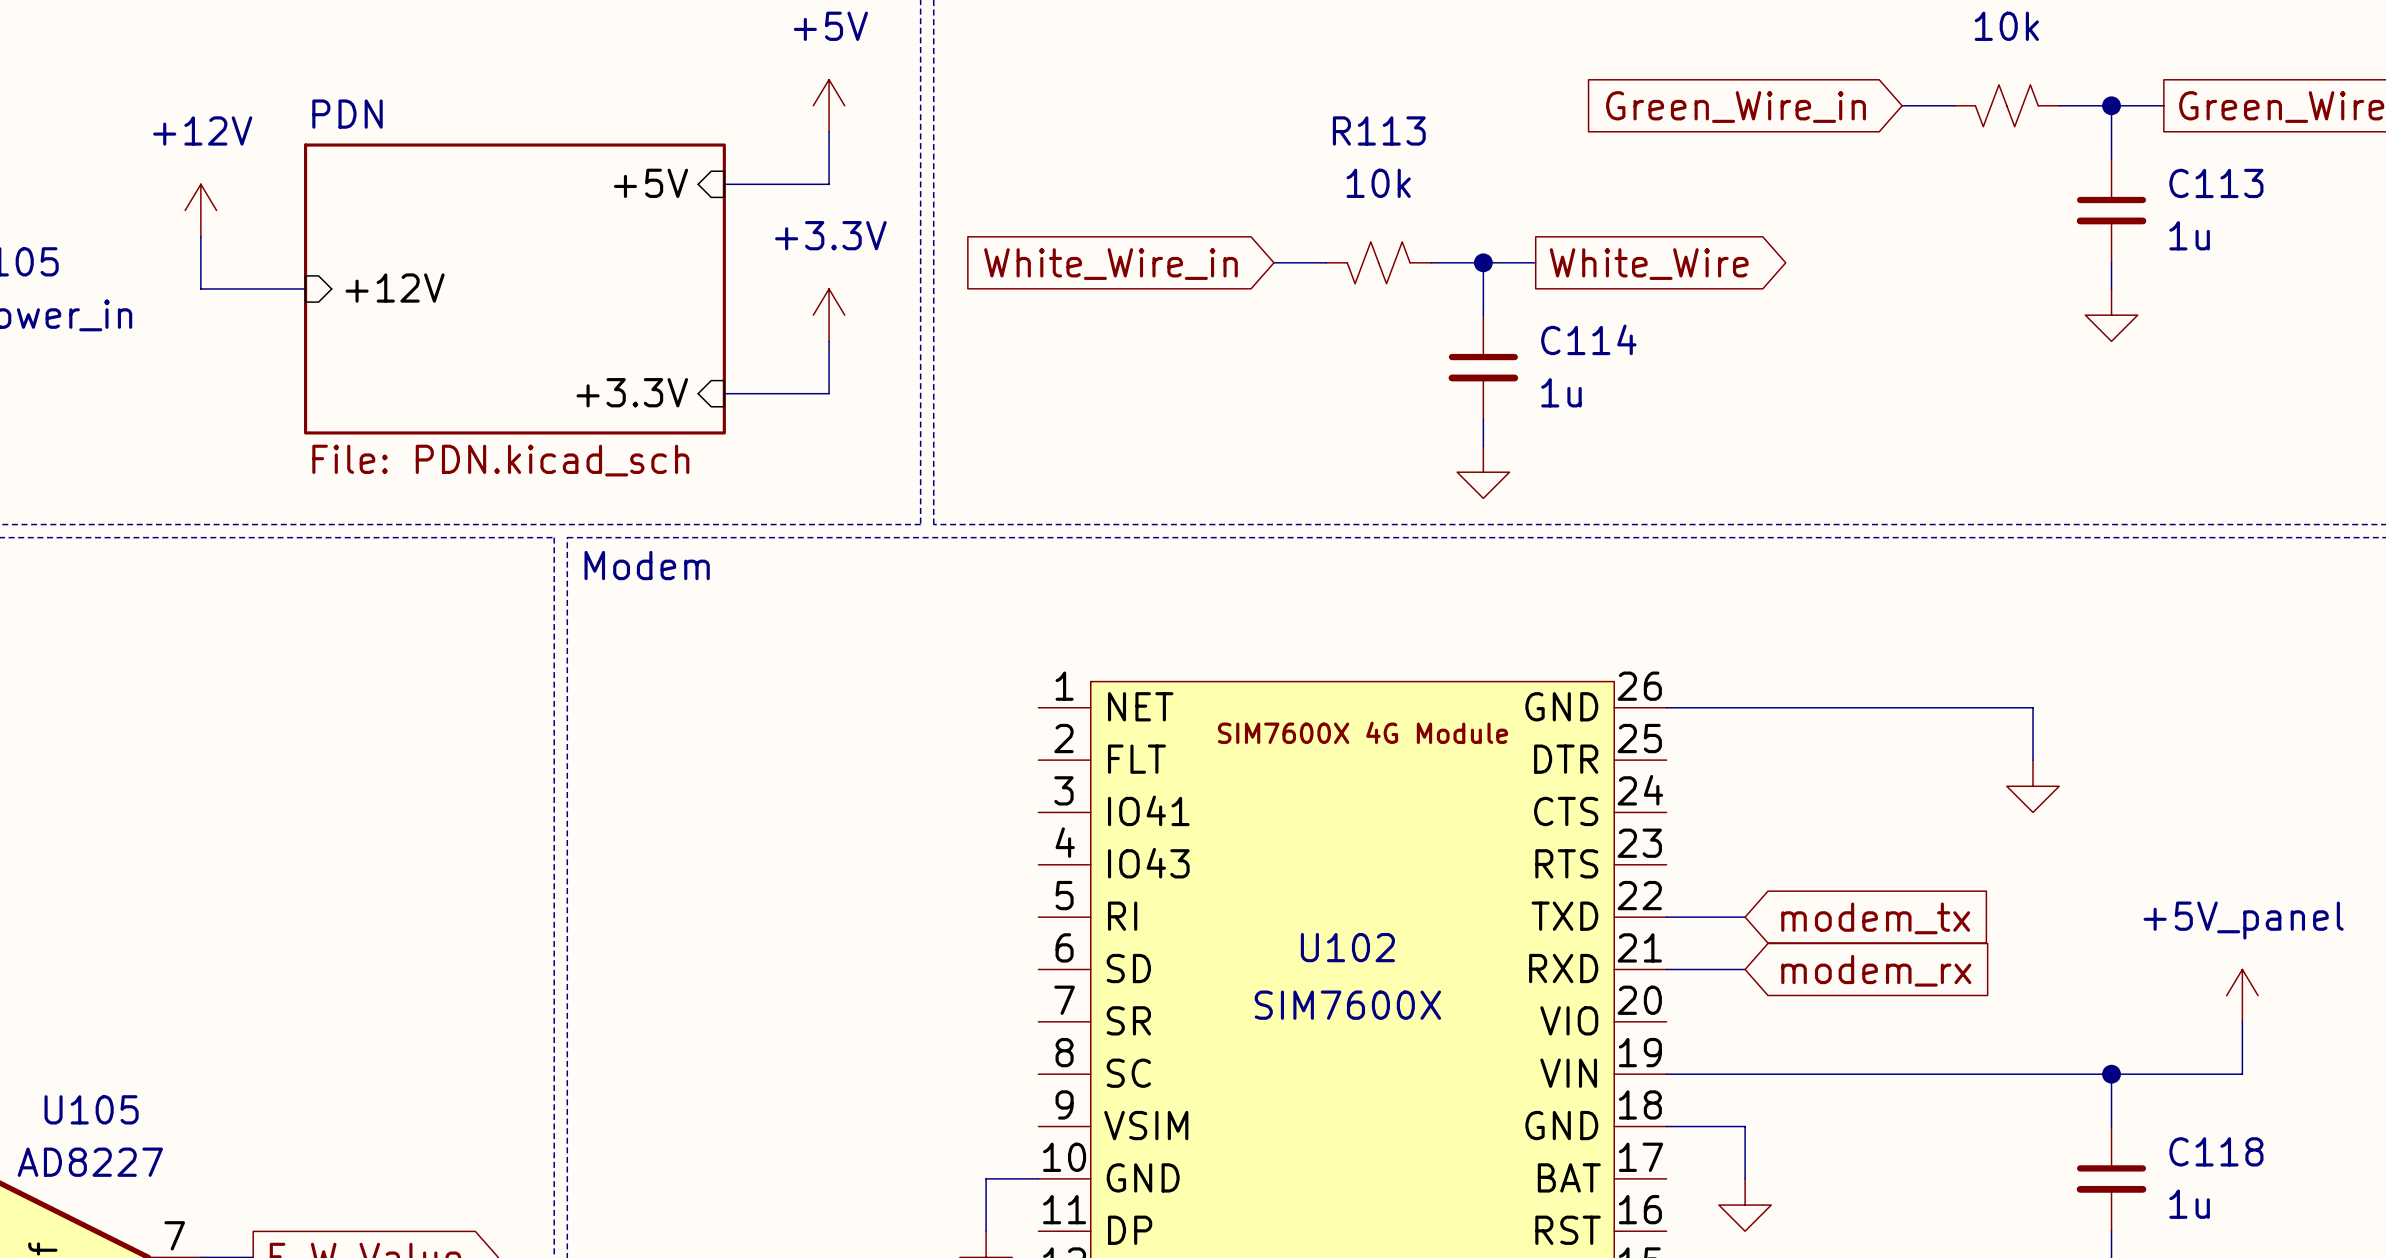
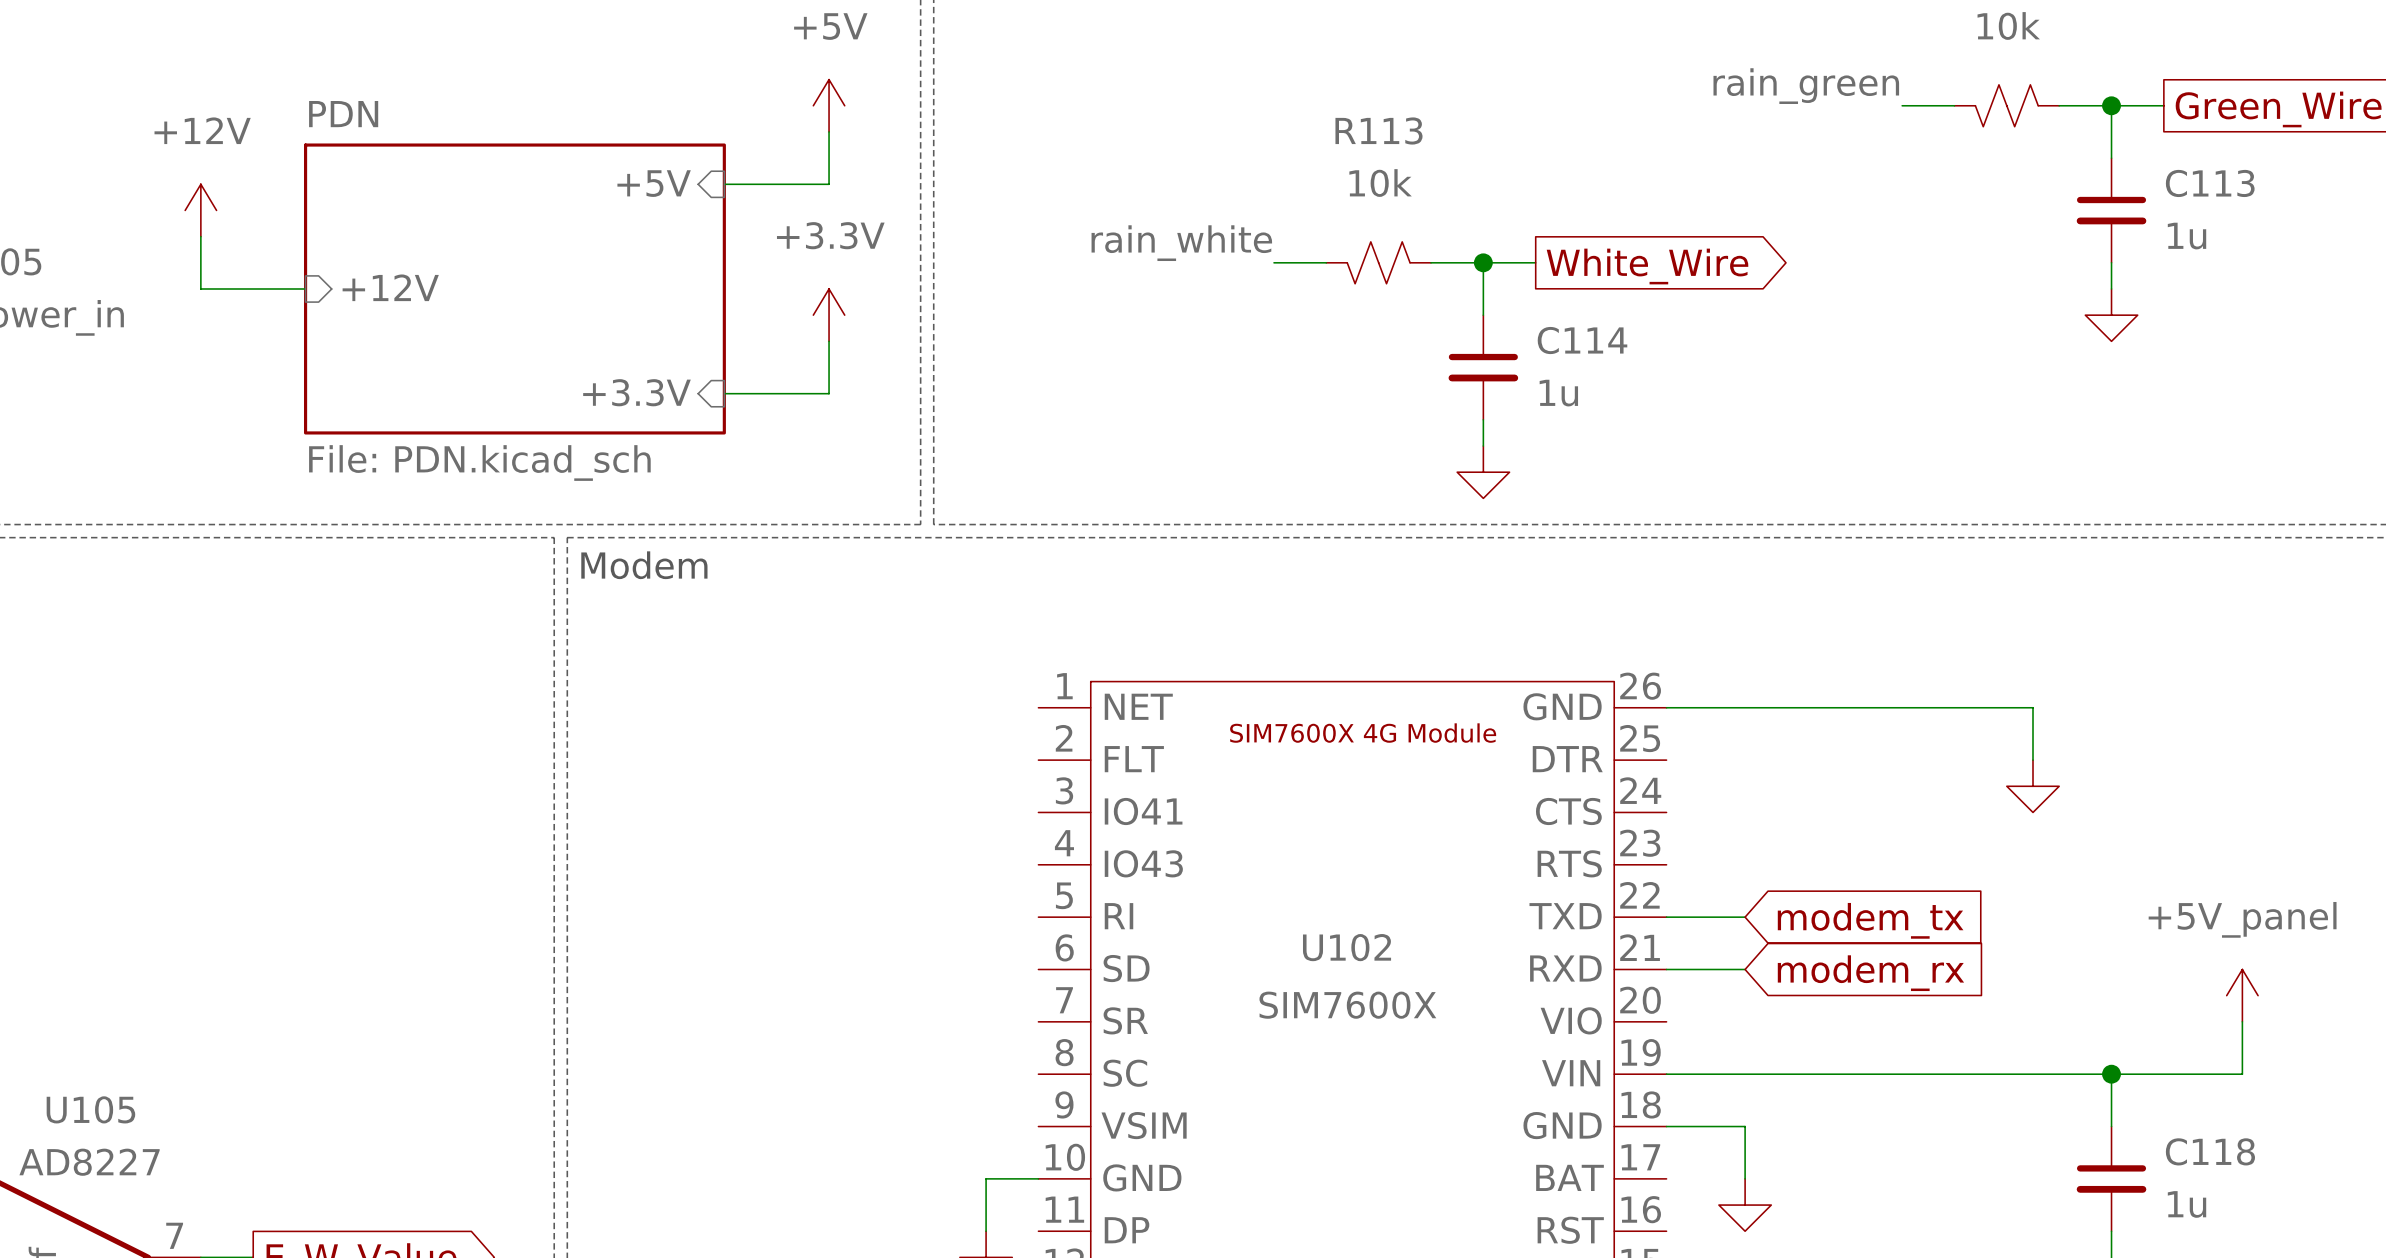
label: none -> rain_green (1806, 86)
global label: Green_Wire_in (1736, 107) -> none
label: none -> rain_white (1181, 243)
global label: White_Wire_in (1110, 264) -> none

